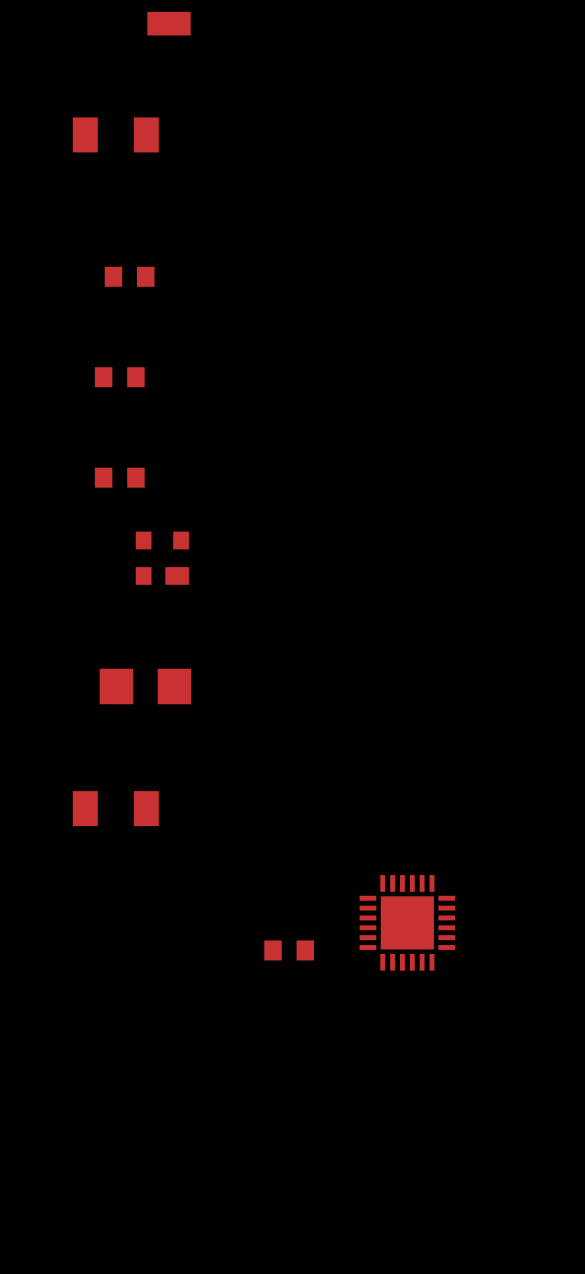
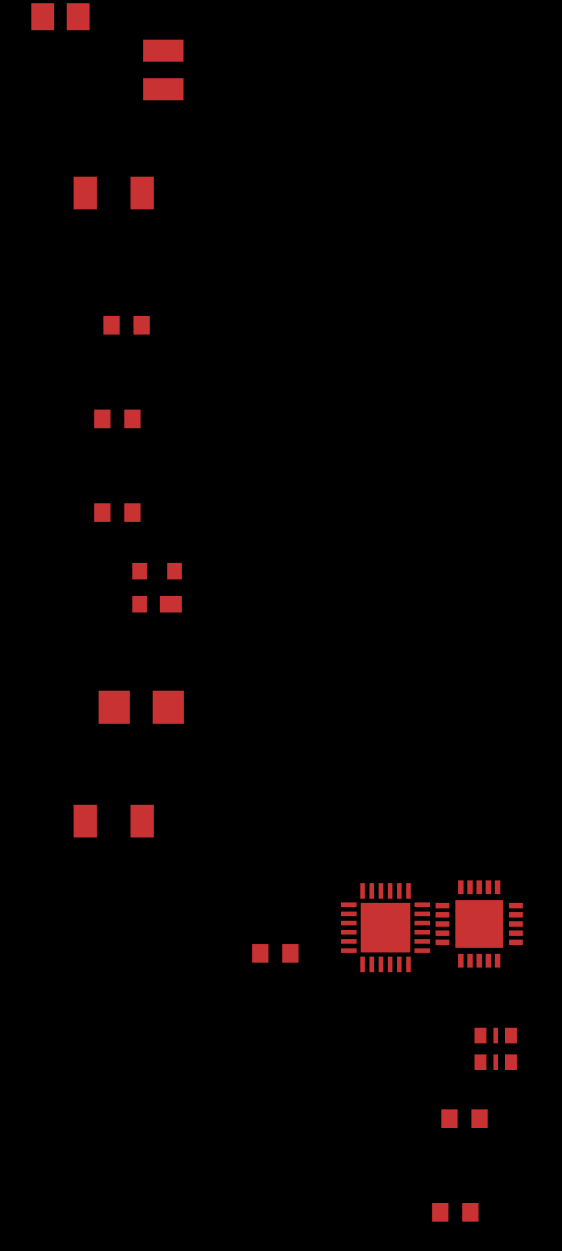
part: none -> (479, 923)
part: none -> (495, 1048)
part: none -> (464, 1118)
part: none -> (455, 1212)

